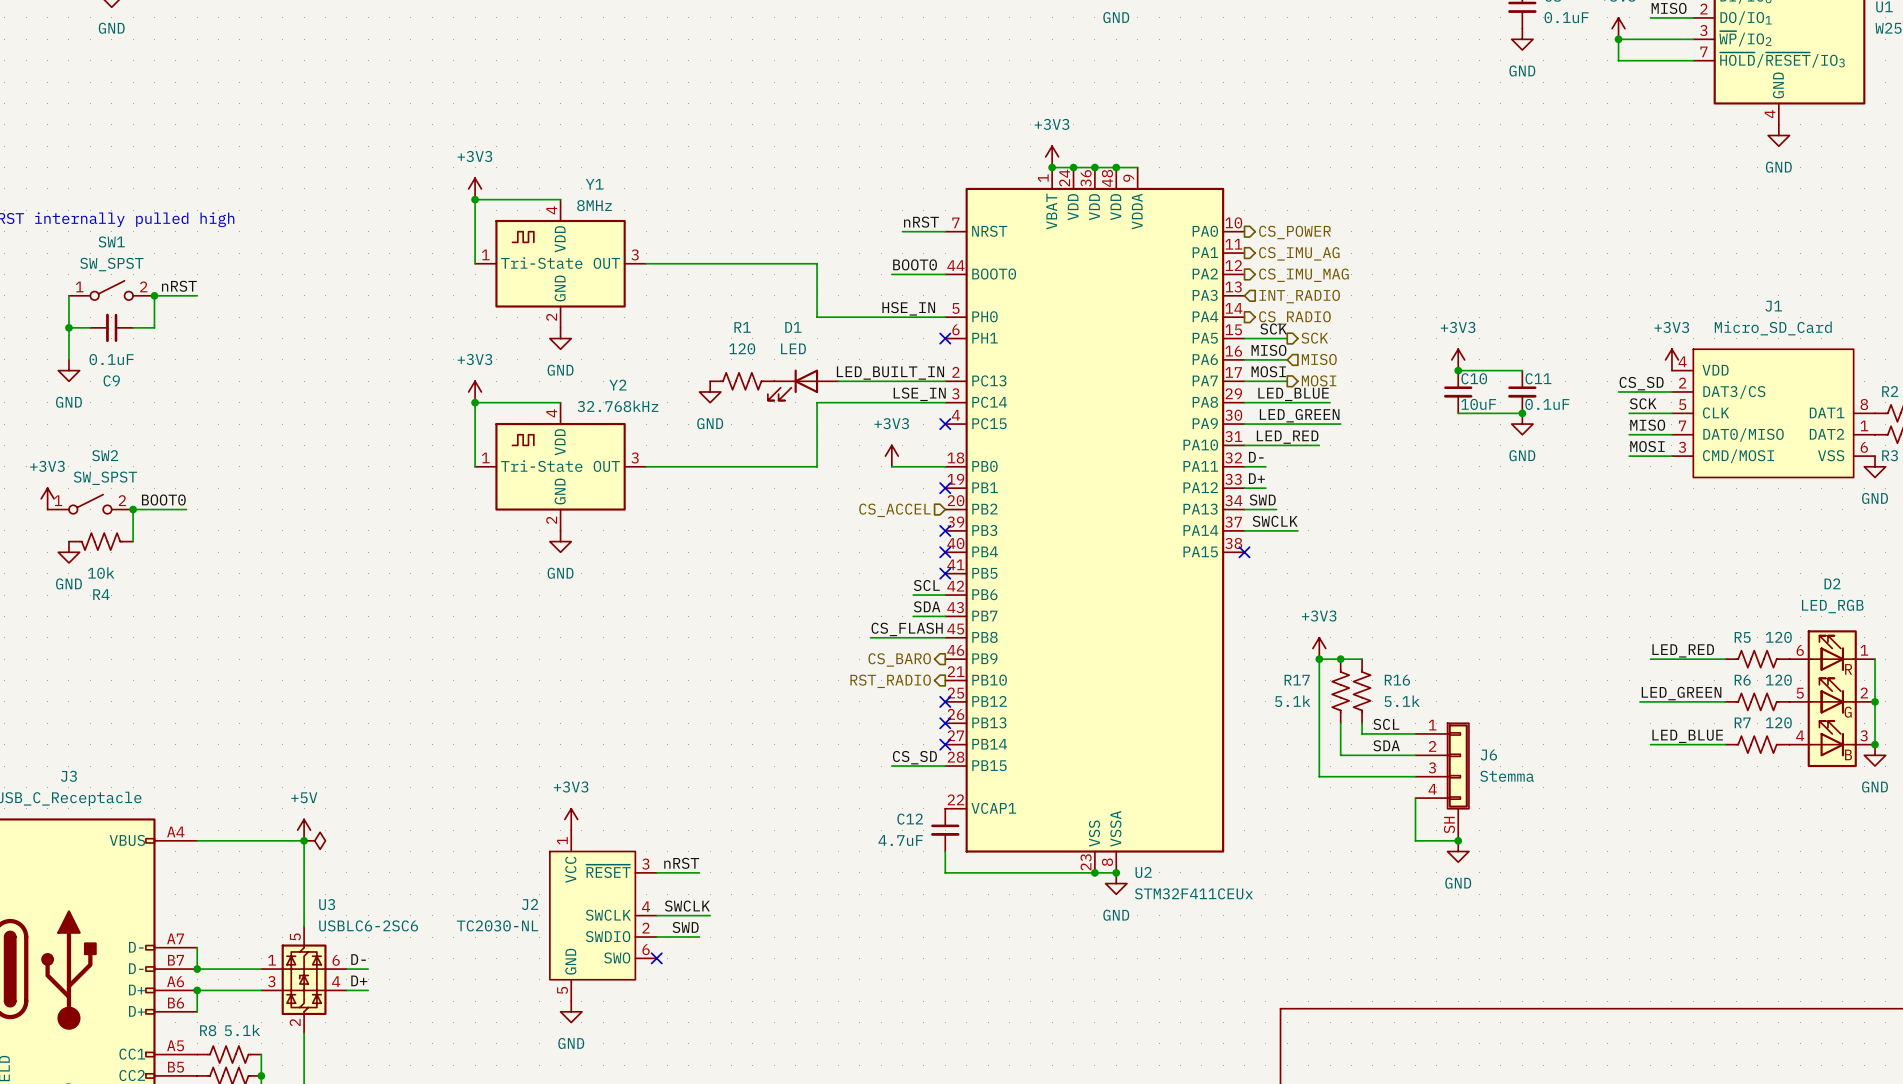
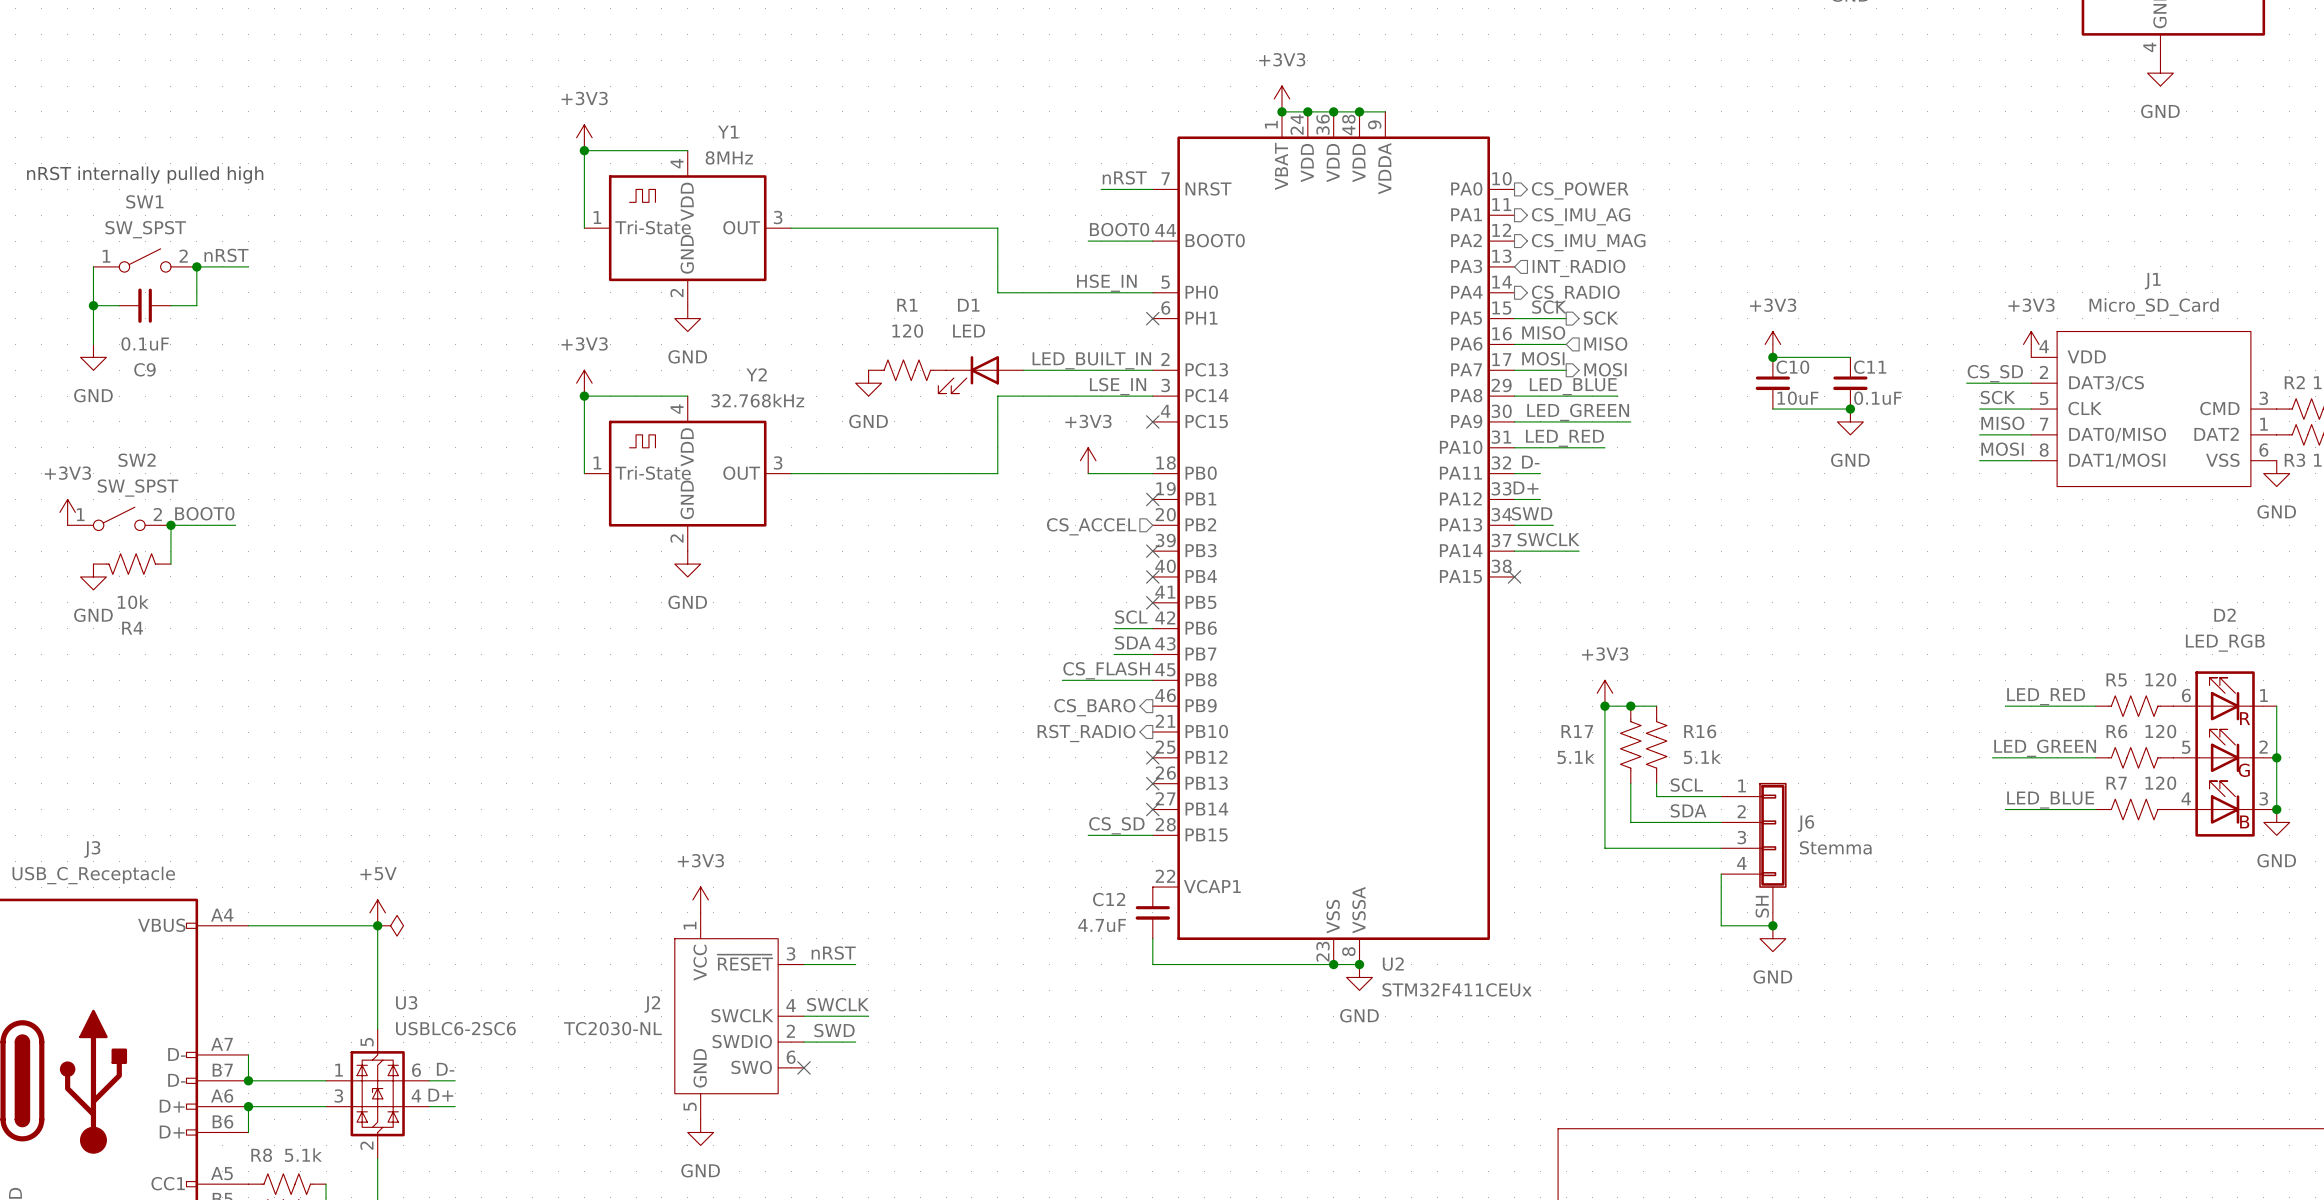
J1 pin number: 8 (1864, 404) -> 3 (2263, 398)
J1 pin name: DAT1 (1827, 412) -> CMD (2219, 408)
J1 pin number: 3 (1682, 447) -> 8 (2044, 450)
J1 pin name: CMD/MOSI (1738, 456) -> DAT1/MOSI (2117, 460)

